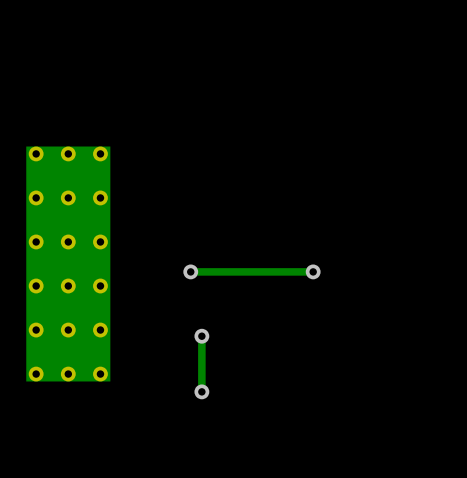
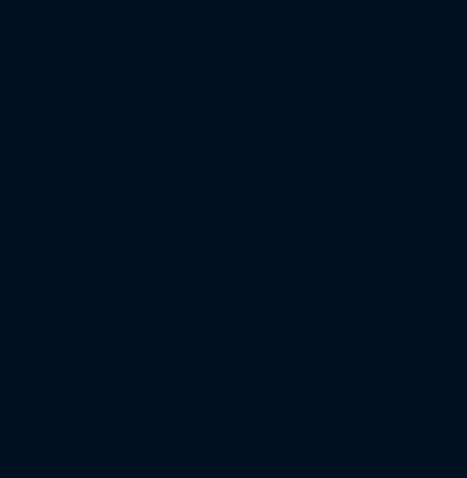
part: (68, 263) -> none
via: (190, 271) -> none
track: (313, 271) (190, 271) -> none
via: (313, 271) -> none
track: (201, 336) (201, 391) -> none
via: (201, 336) -> none
via: (201, 391) -> none

